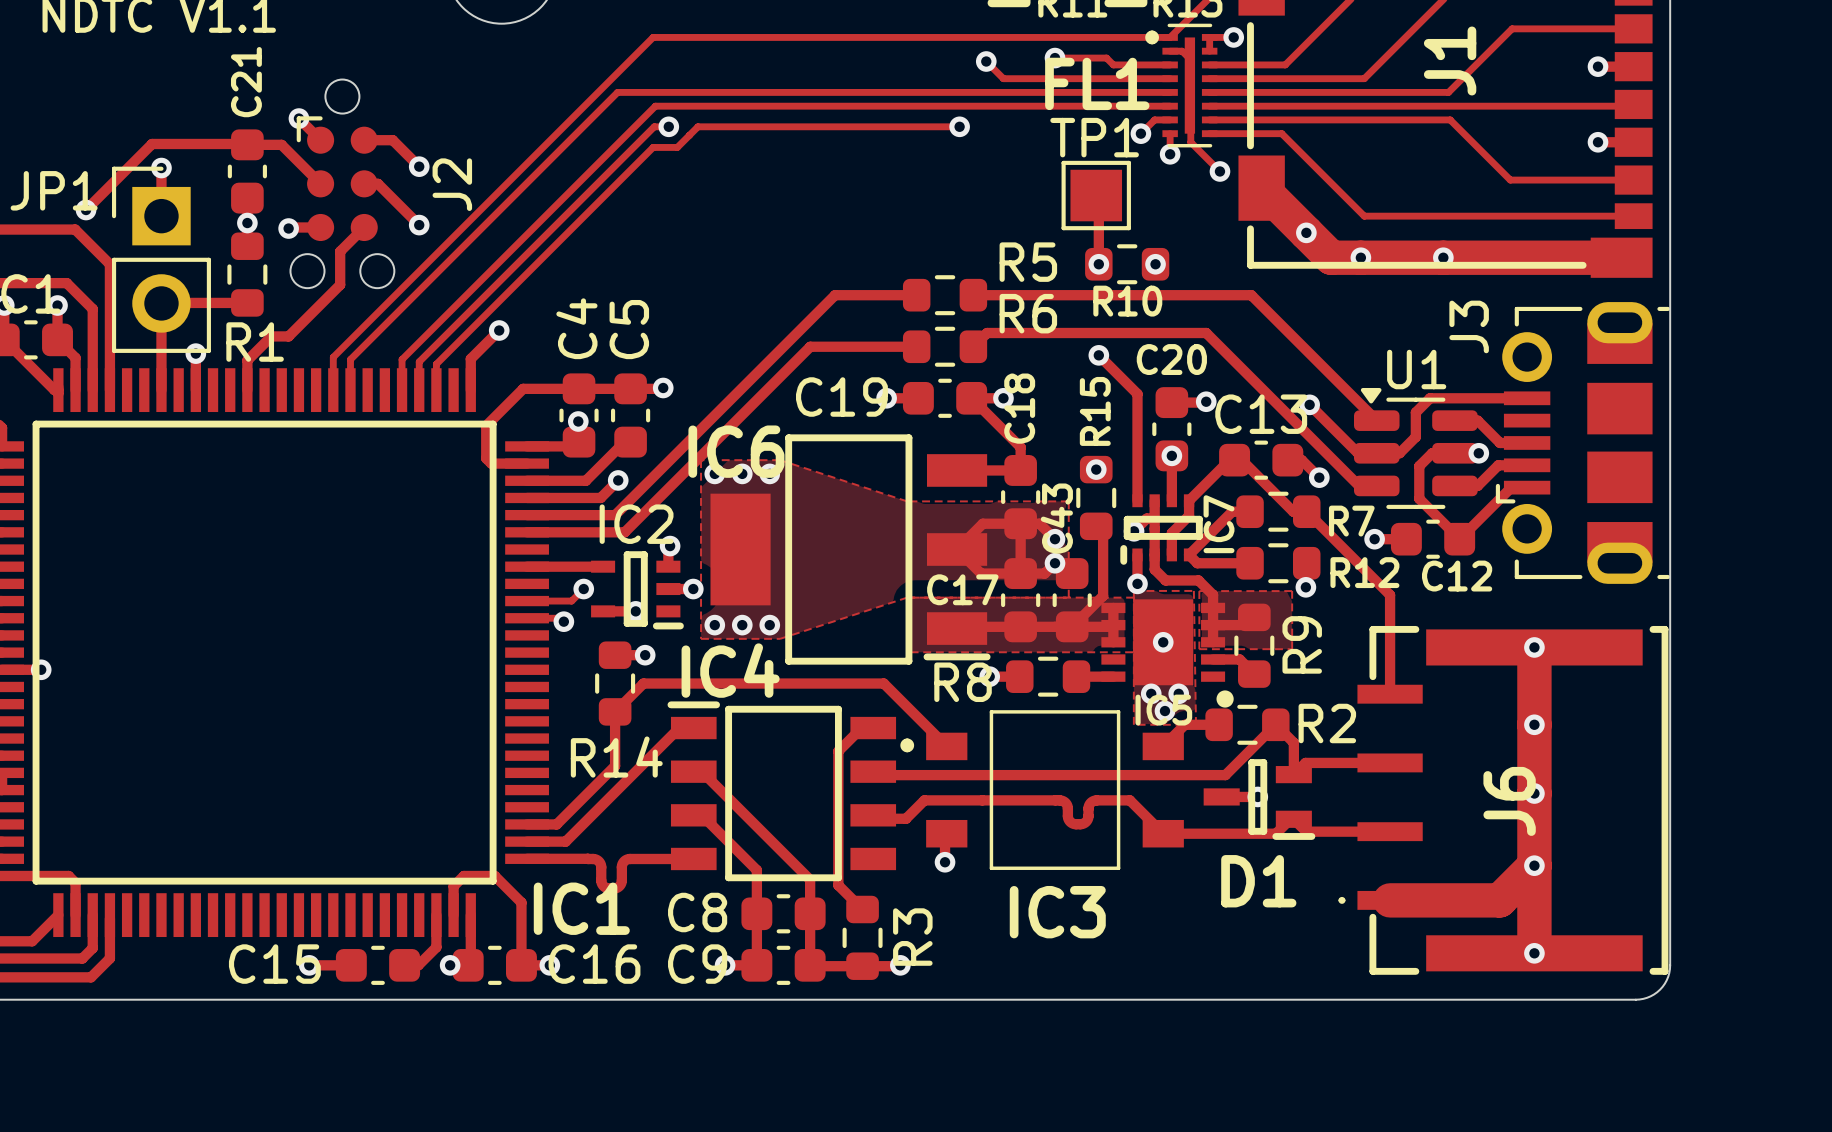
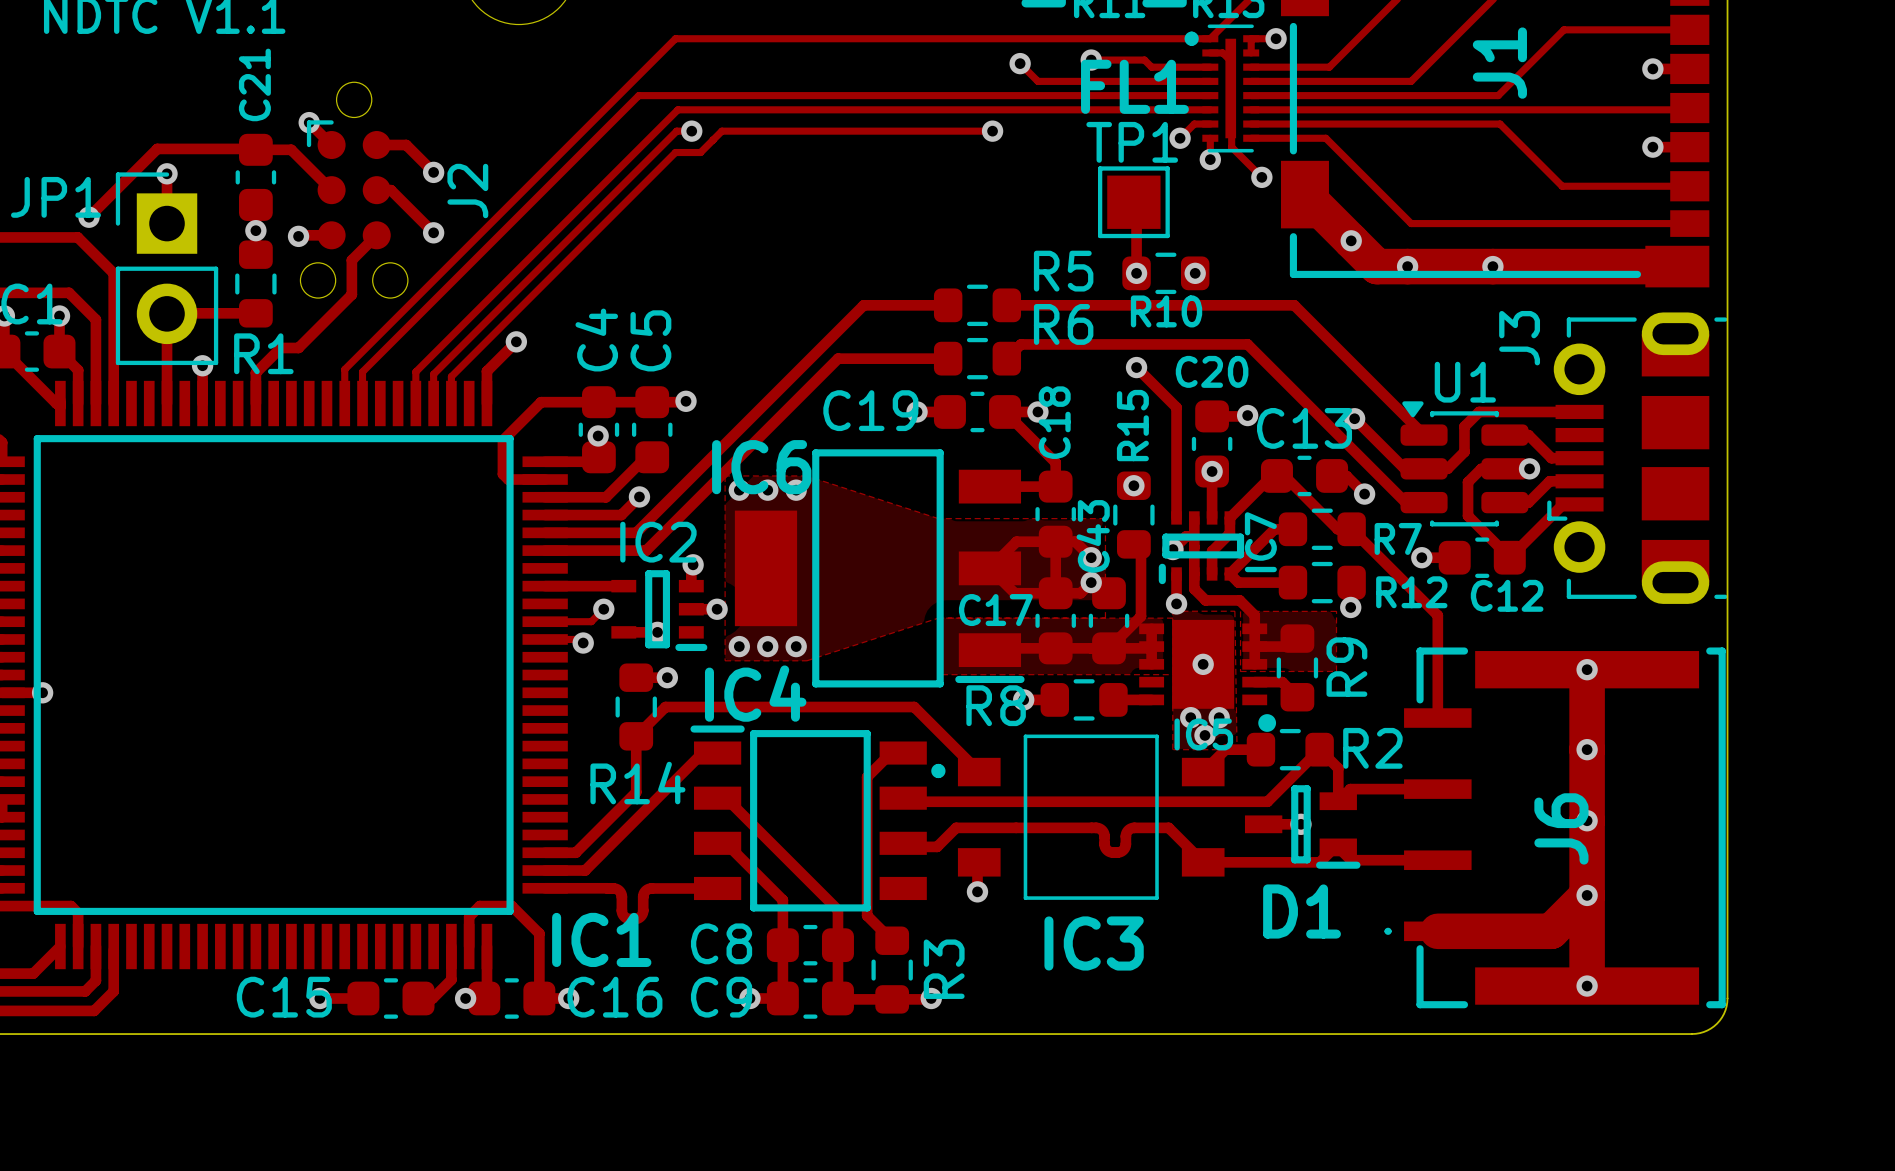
U1 footprint: [1354, 387, 1478, 509] -> [1400, 401, 1529, 527]

